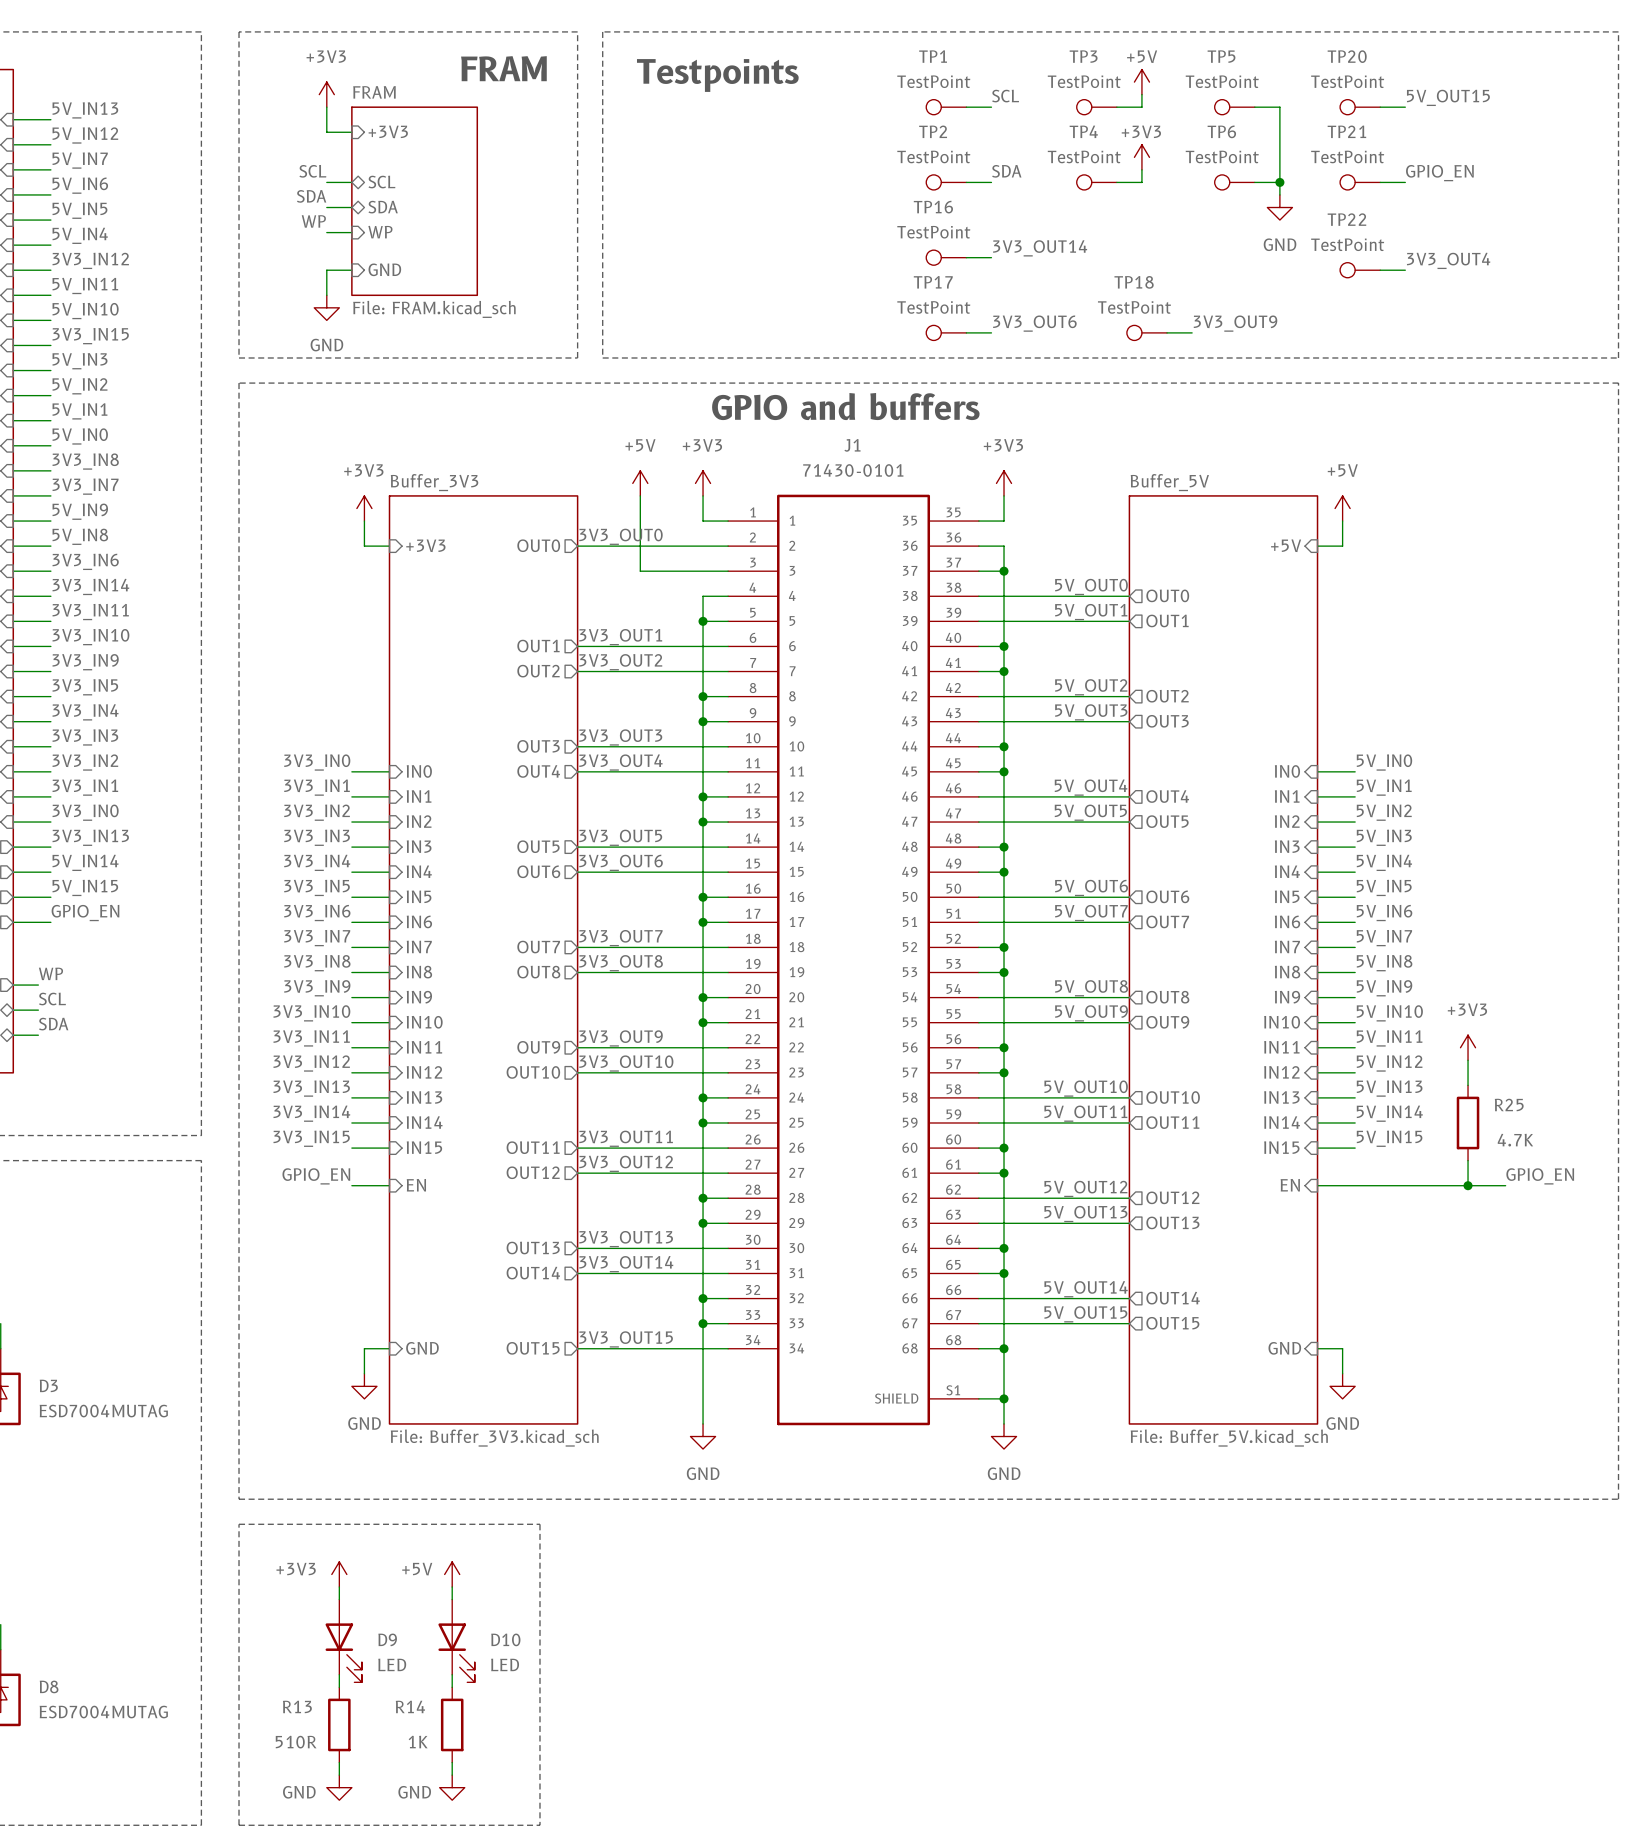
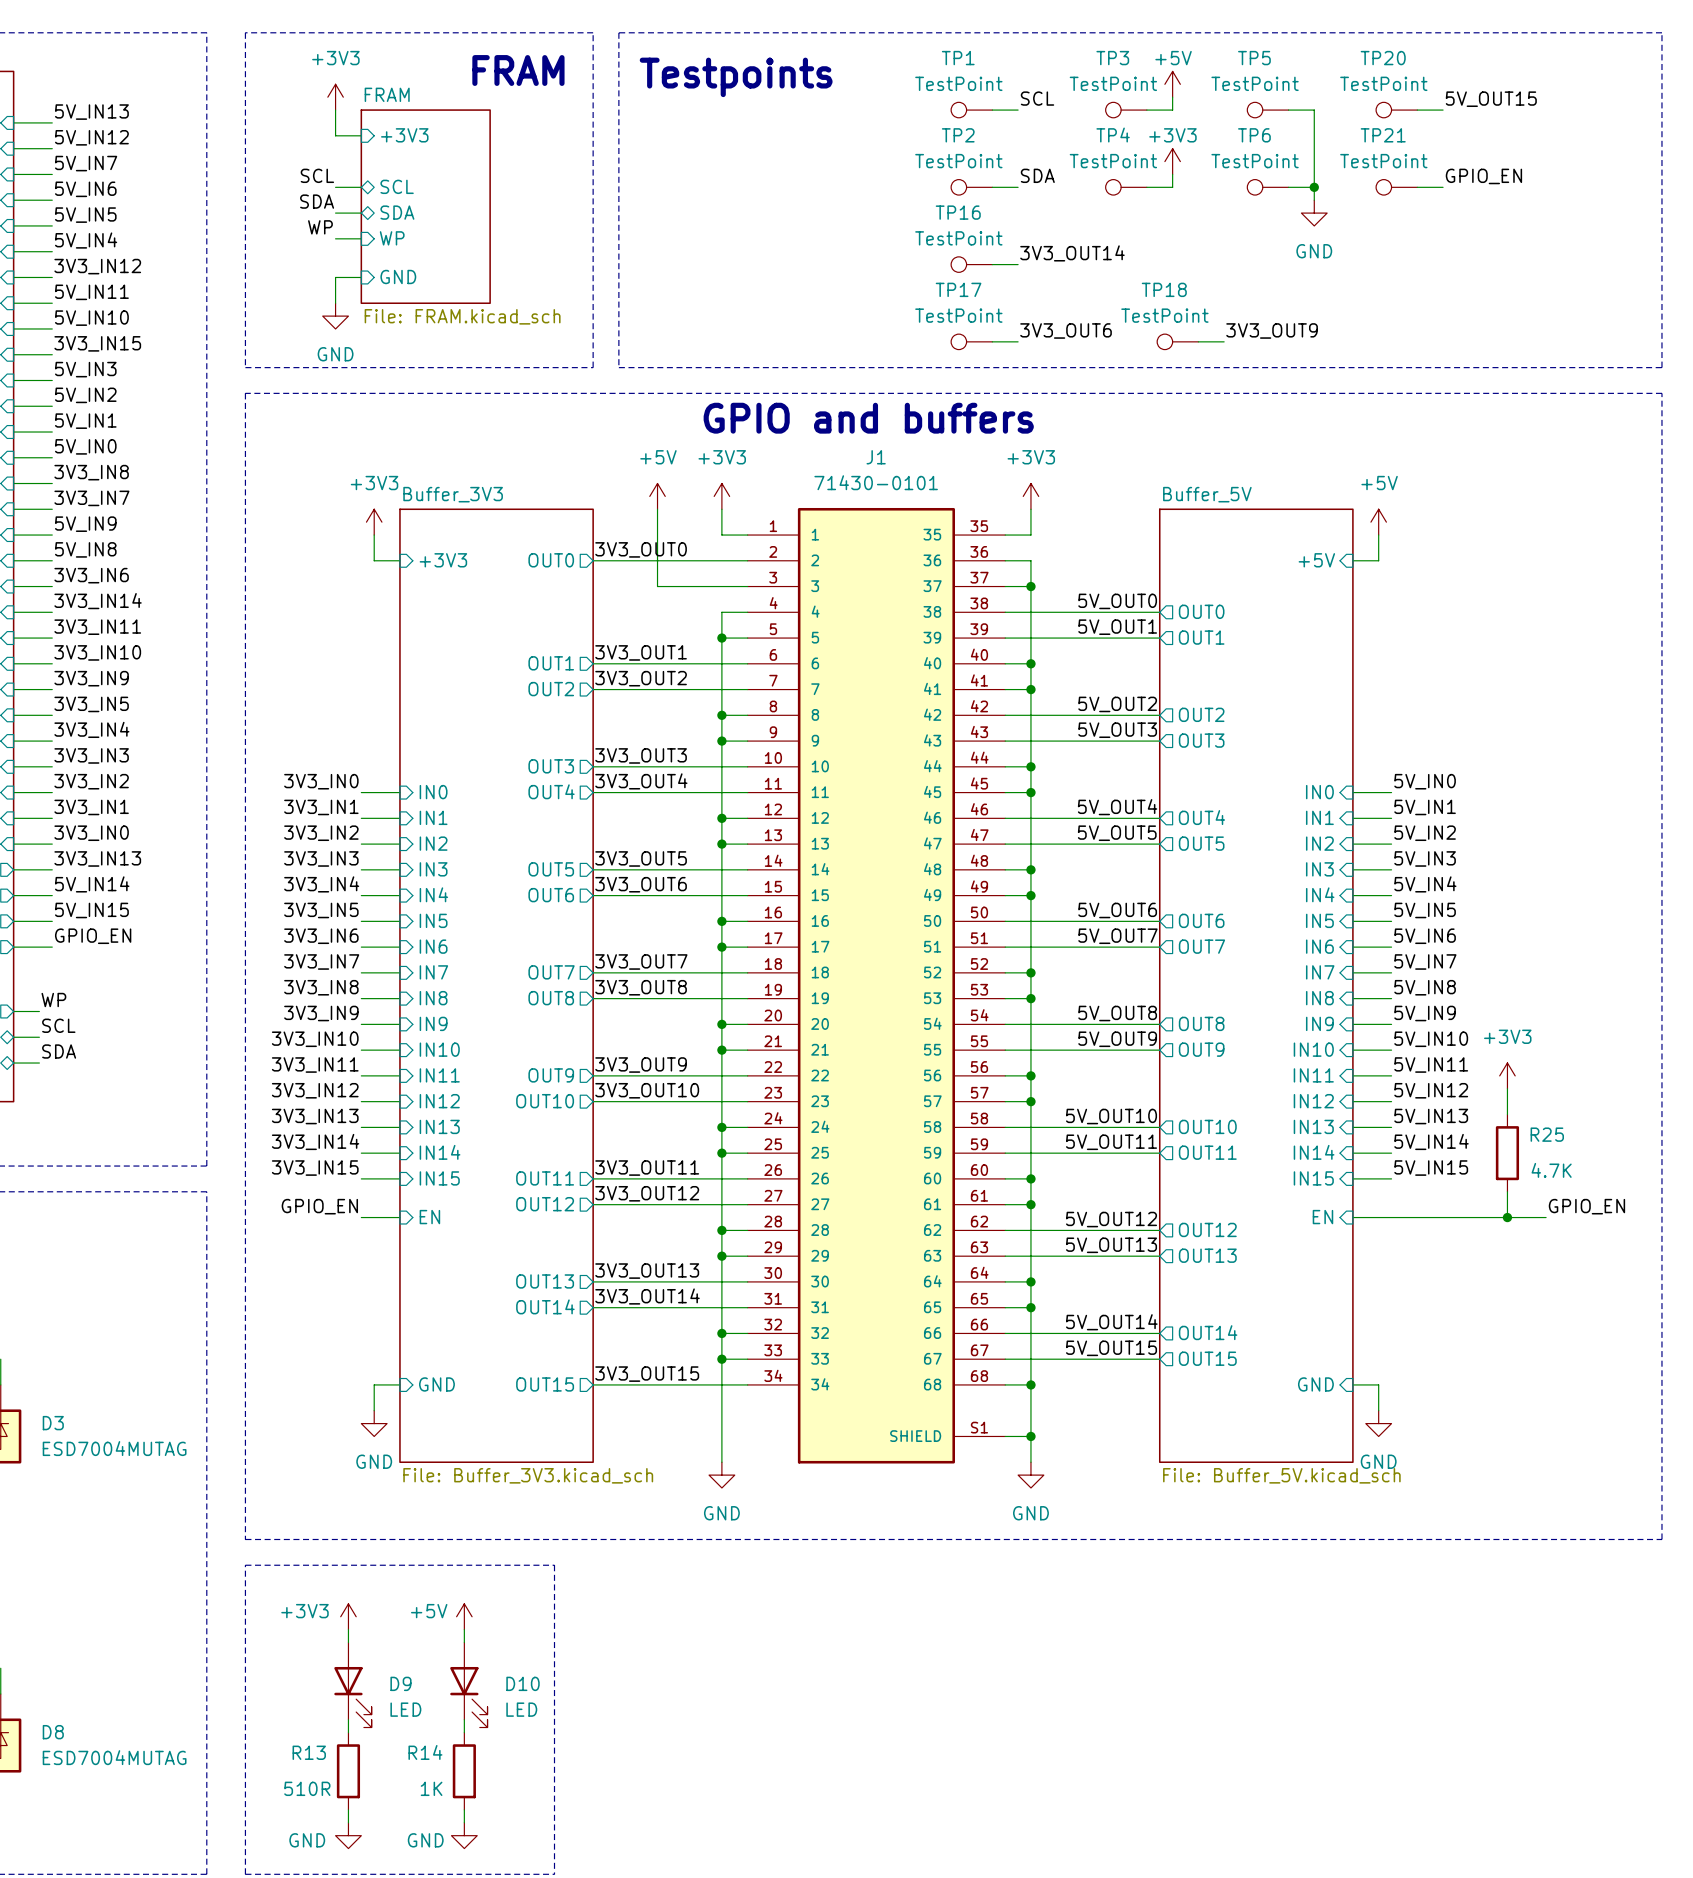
label: 3V3_OUT4 (1448, 260) -> none
TP22: TestPoint (1360, 270) -> none
wire: (1380, 270) (1405, 270) -> none

